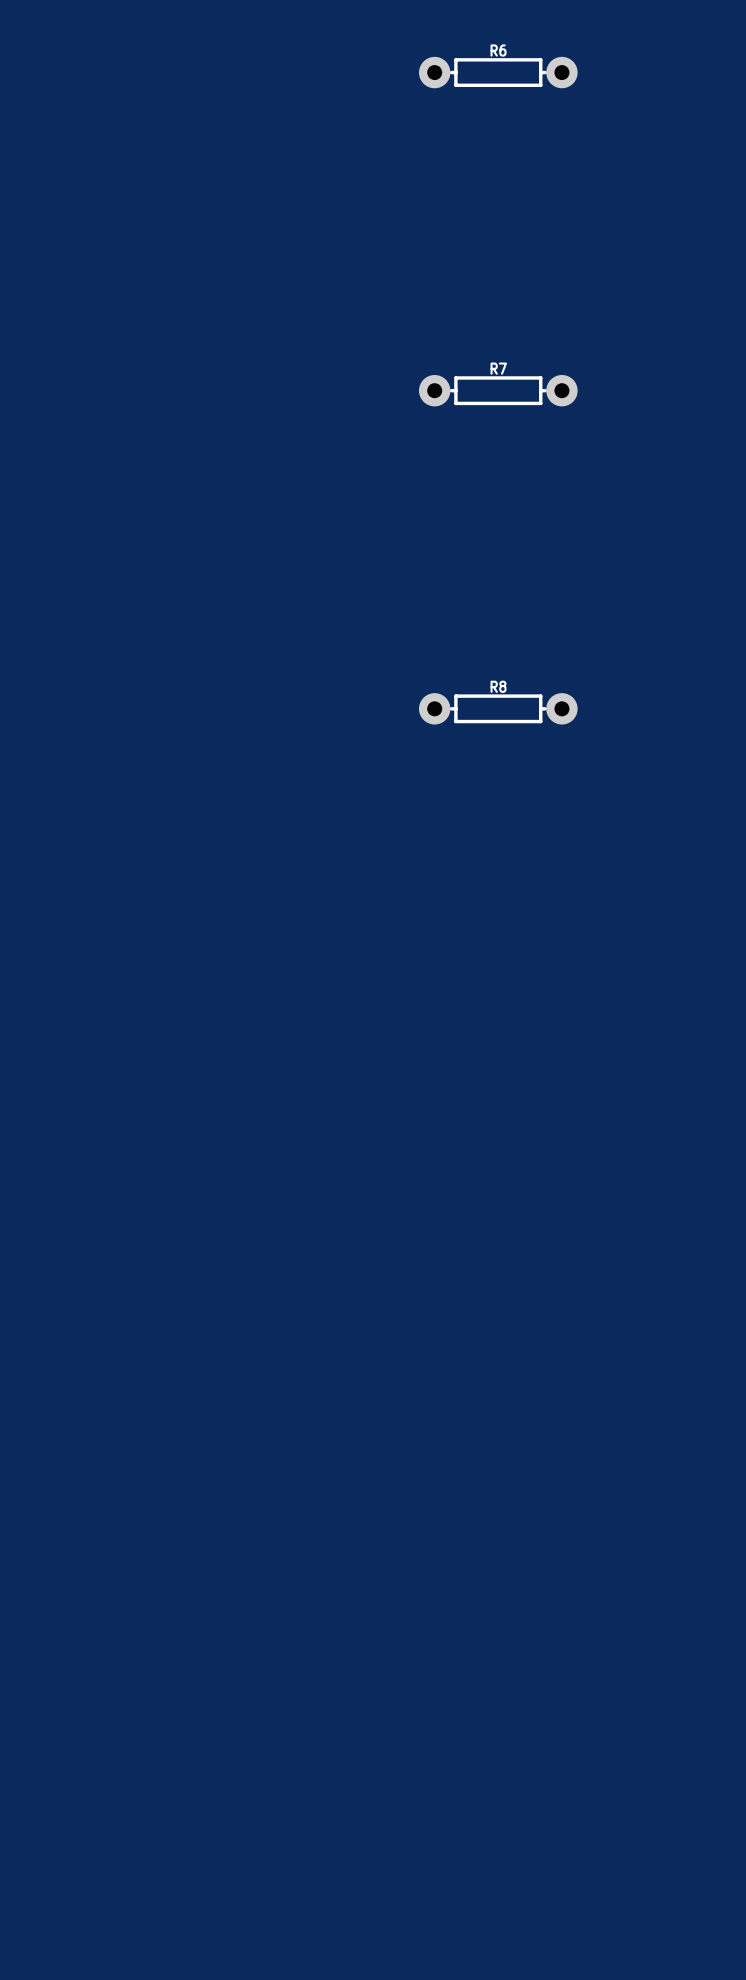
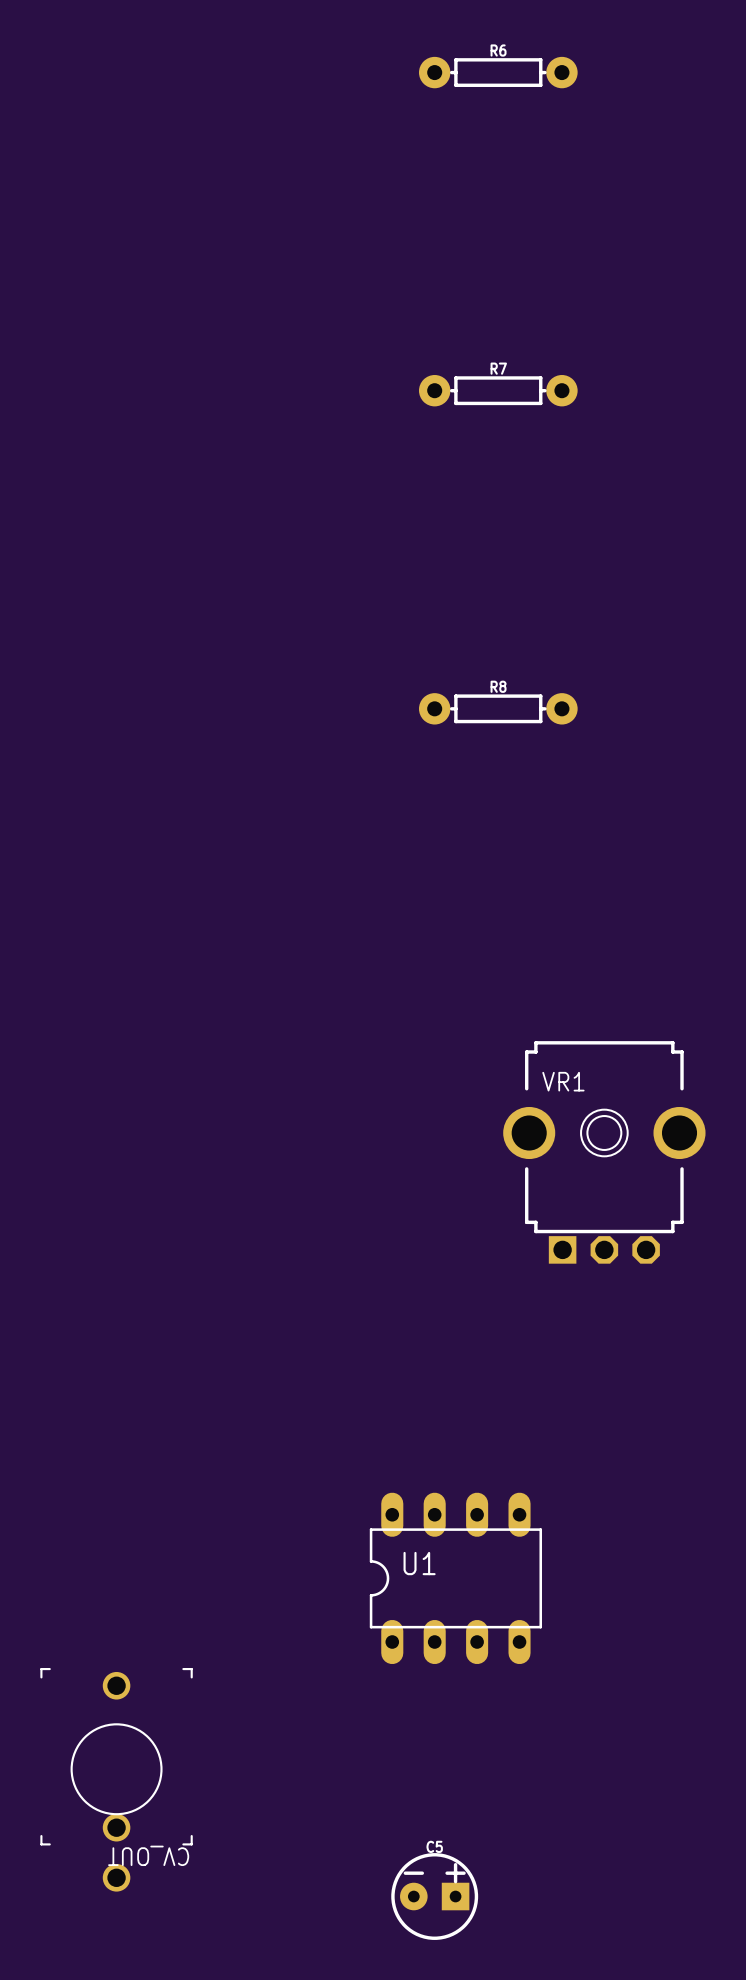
VR1: none -> (604, 1152)
U1: none -> (455, 1578)
CV_OUT: none -> (116, 1779)
C5: none -> (434, 1896)

